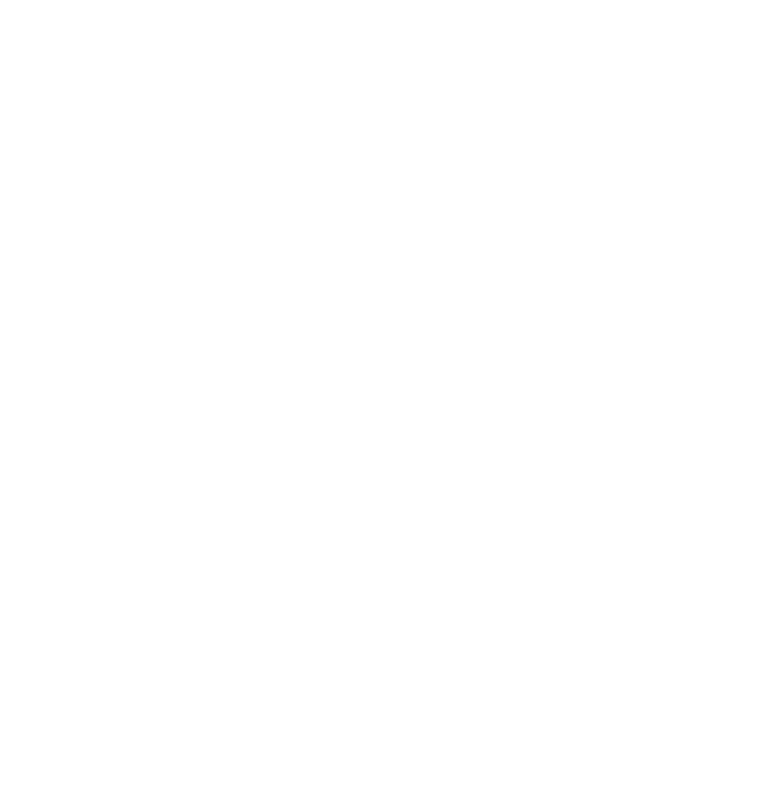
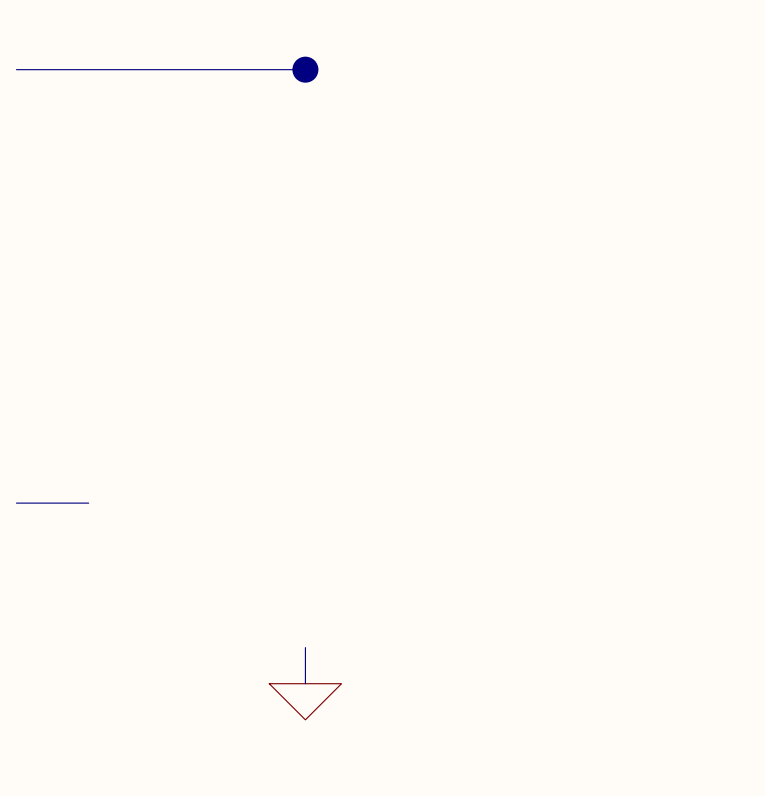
wire: none -> (16, 69) (305, 69)
junction: none -> (305, 69)
wire: none -> (16, 503) (88, 503)
wire: none -> (305, 647) (305, 683)
power symbol: none -> (305, 701)

